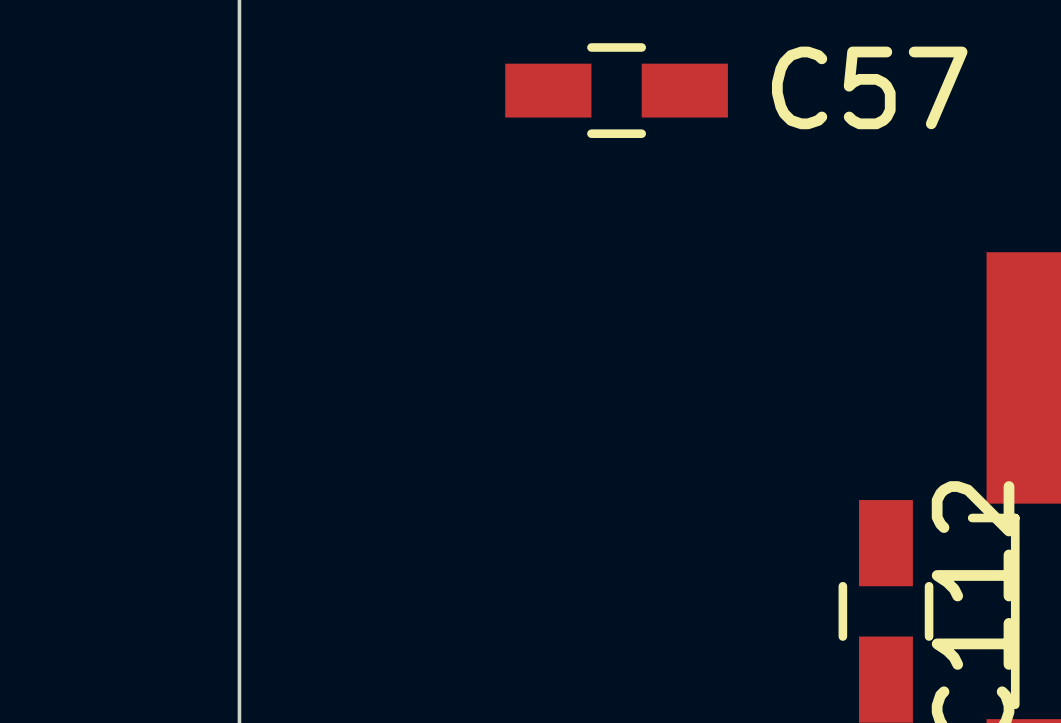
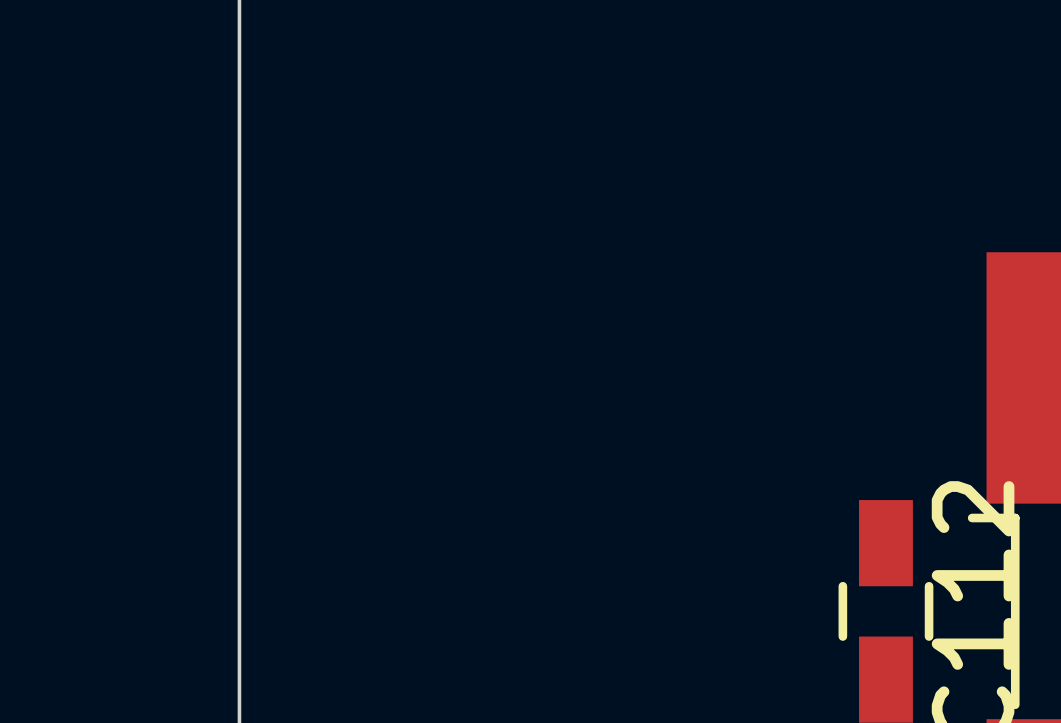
C57: (616, 90) -> none

